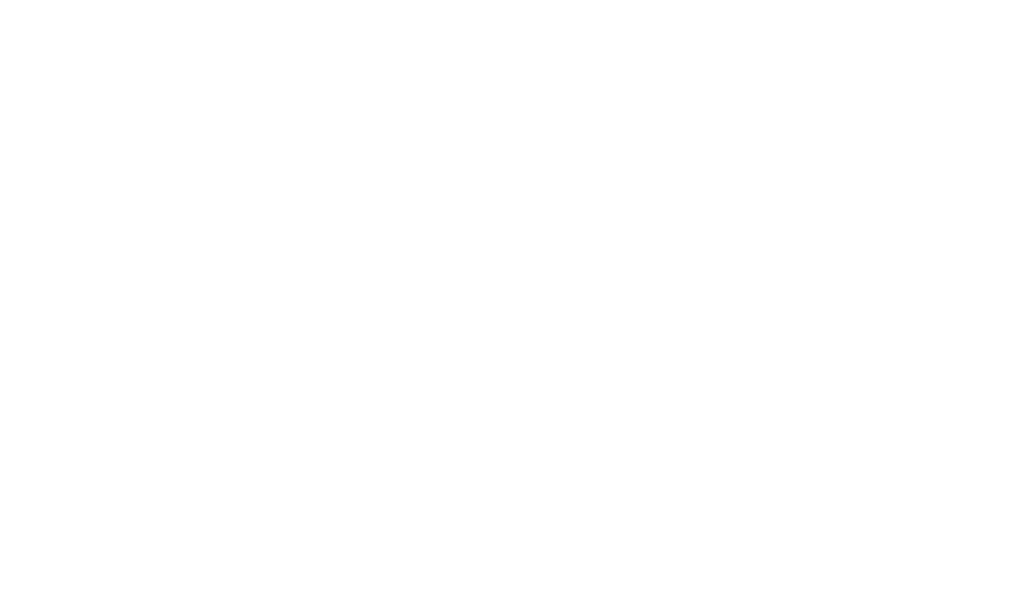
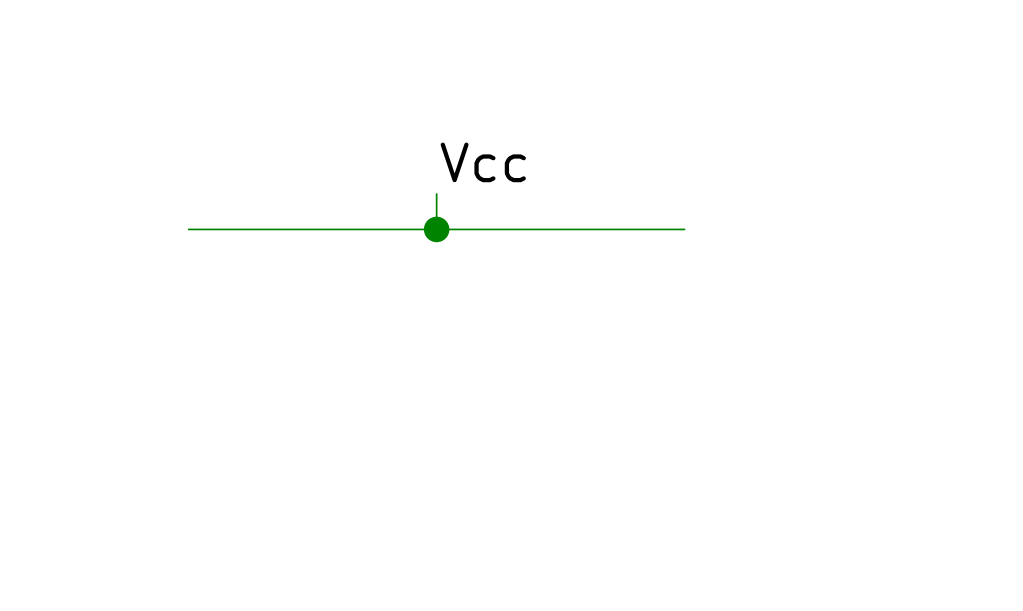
label: none -> Vcc (483, 162)
wire: none -> (436, 194) (436, 229)
wire: none -> (188, 229) (684, 229)
junction: none -> (436, 229)

